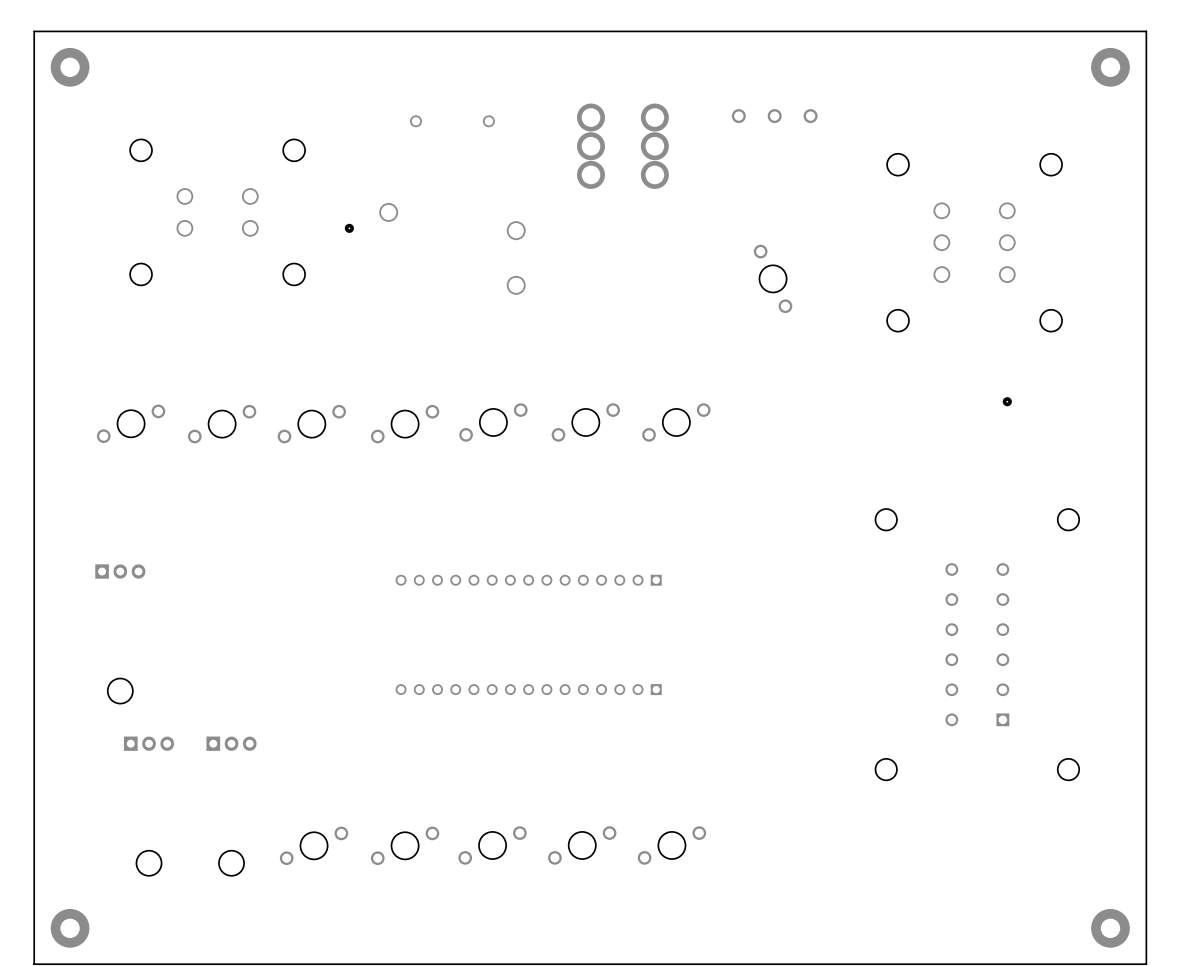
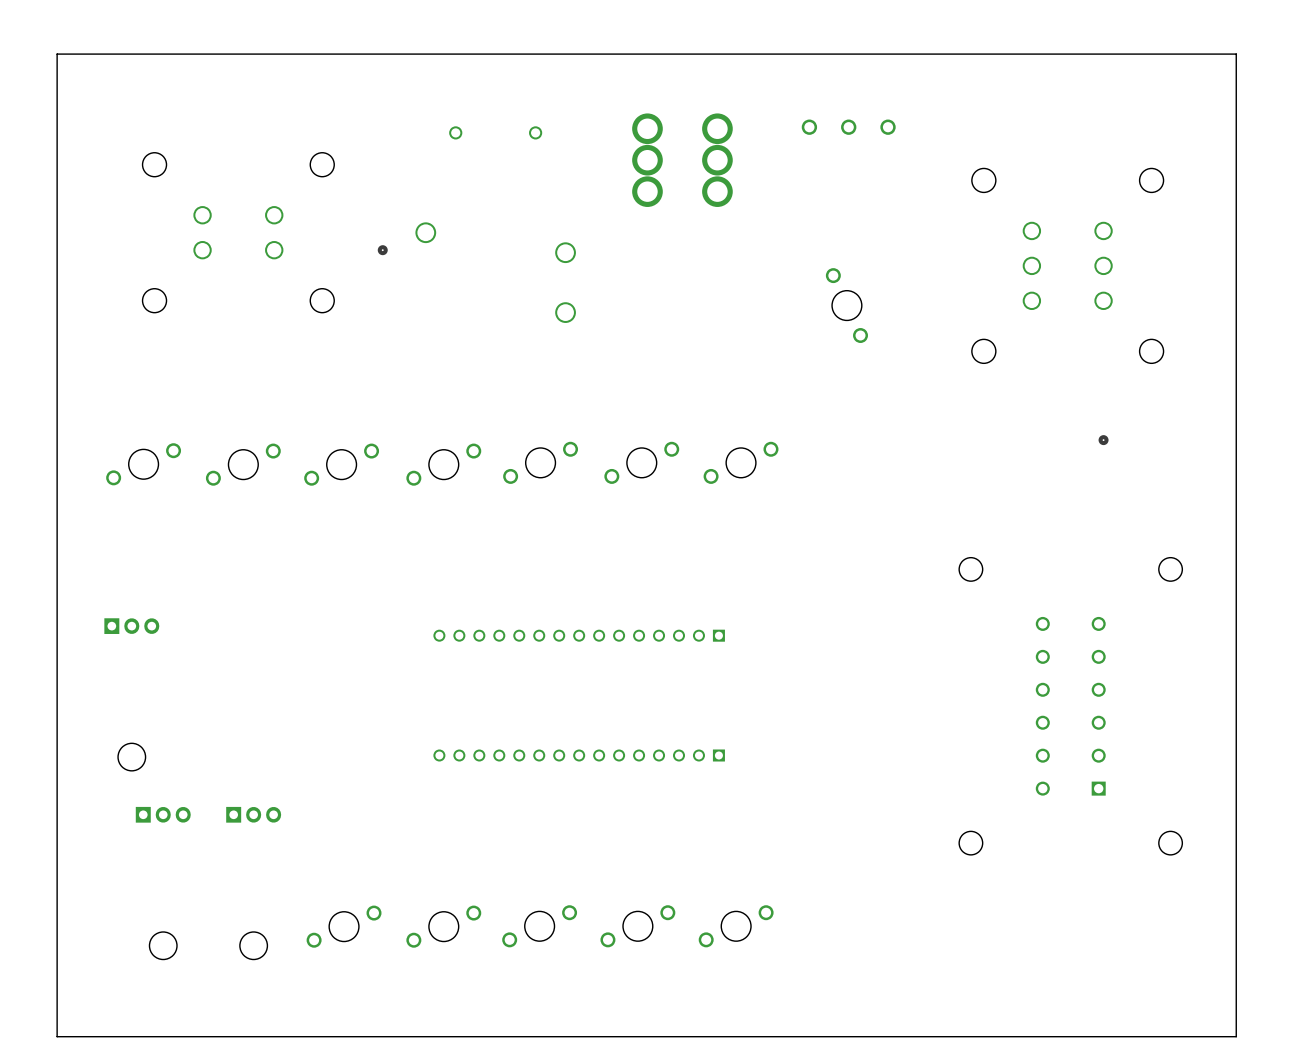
board edge: (1146, 31) (34, 31) (34, 964) (1146, 964) (1146, 31) -> (1236, 54) (1236, 1036) (57, 1036) (57, 54) (1236, 54)
part: (70, 67) -> none
part: (1110, 67) -> none
part: (70, 928) -> none
part: (1110, 928) -> none

